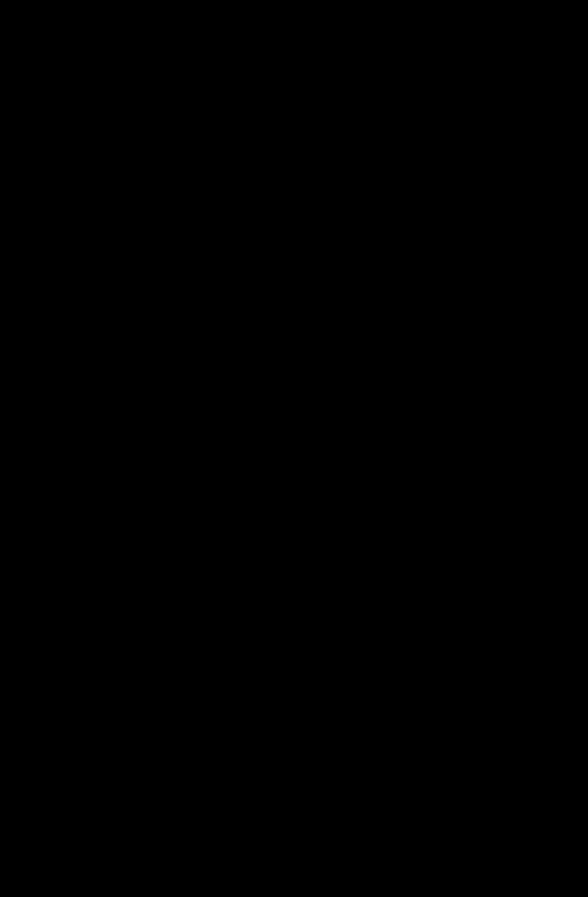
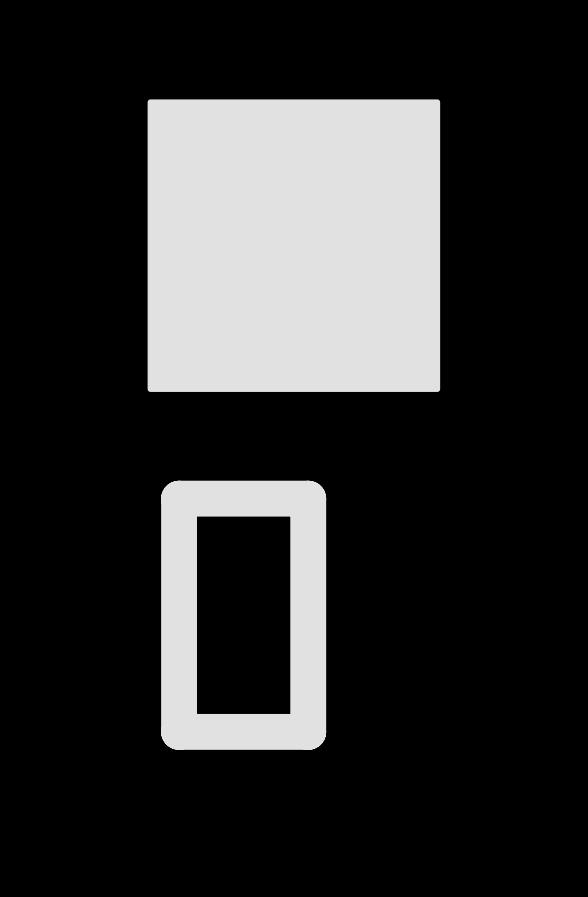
drawing: none -> [147, 99, 441, 392]
line: none -> (308, 498) (179, 498) (179, 731) (308, 731) (308, 498)

